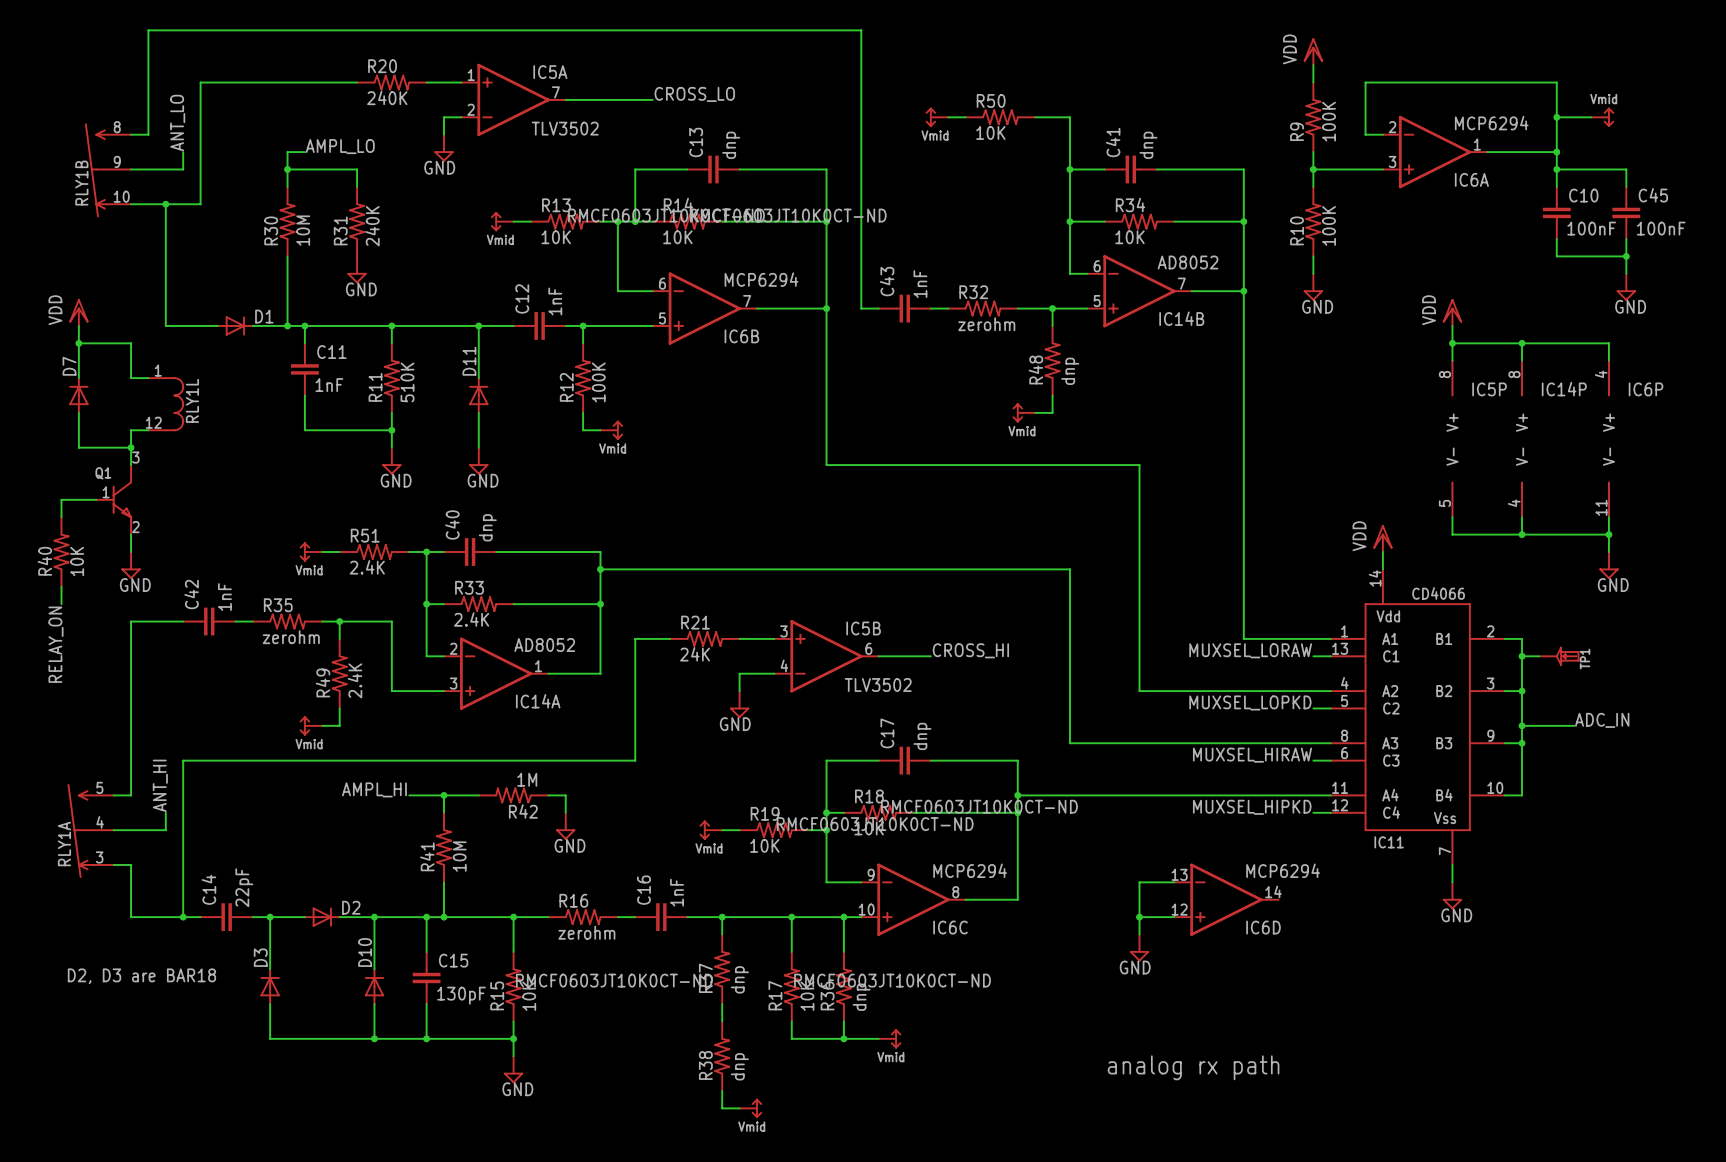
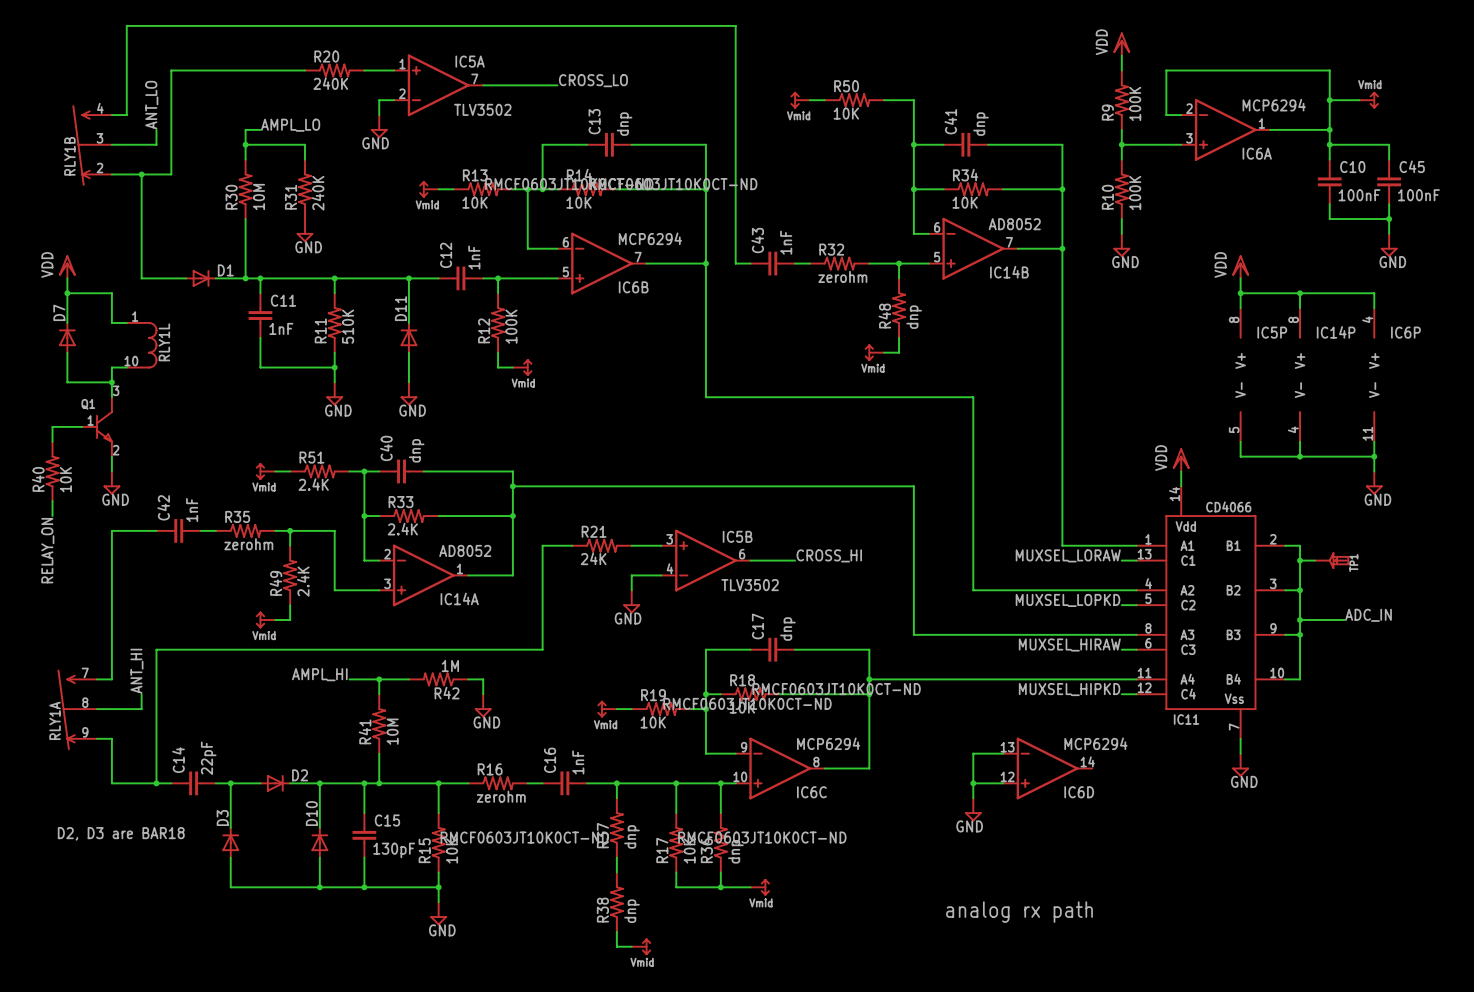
RLY1B pin number: 8 (117, 127) -> 4 (100, 108)
RLY1B pin number: 9 (117, 161) -> 3 (99, 138)
RLY1B pin number: 10 (121, 196) -> 2 (99, 168)
RLY1L pin number: 12 (153, 422) -> 10 (131, 361)
RLY1A pin number: 5 (99, 787) -> 7 (85, 672)
RLY1A pin number: 4 (100, 822) -> 8 (85, 702)
RLY1A pin number: 3 (99, 857) -> 9 (85, 732)

